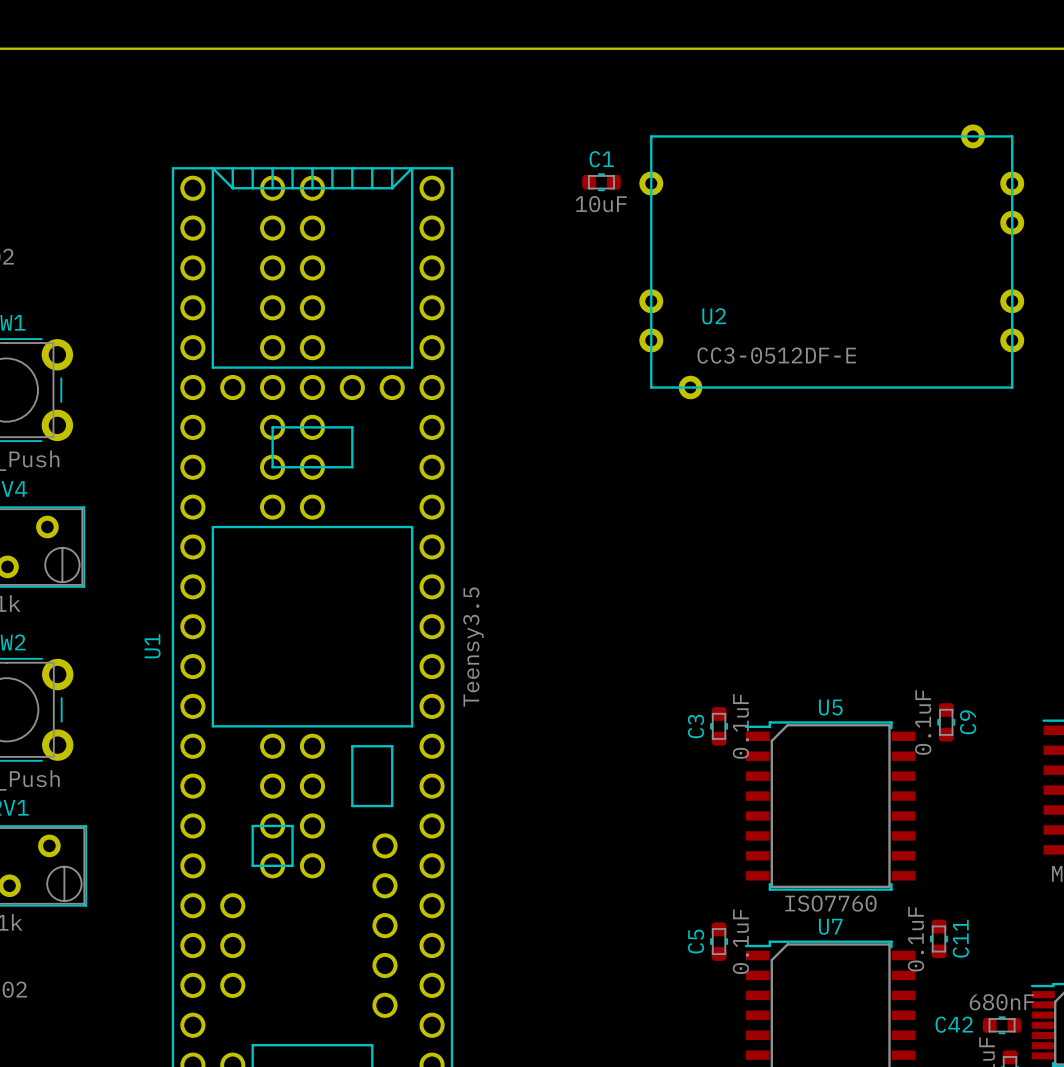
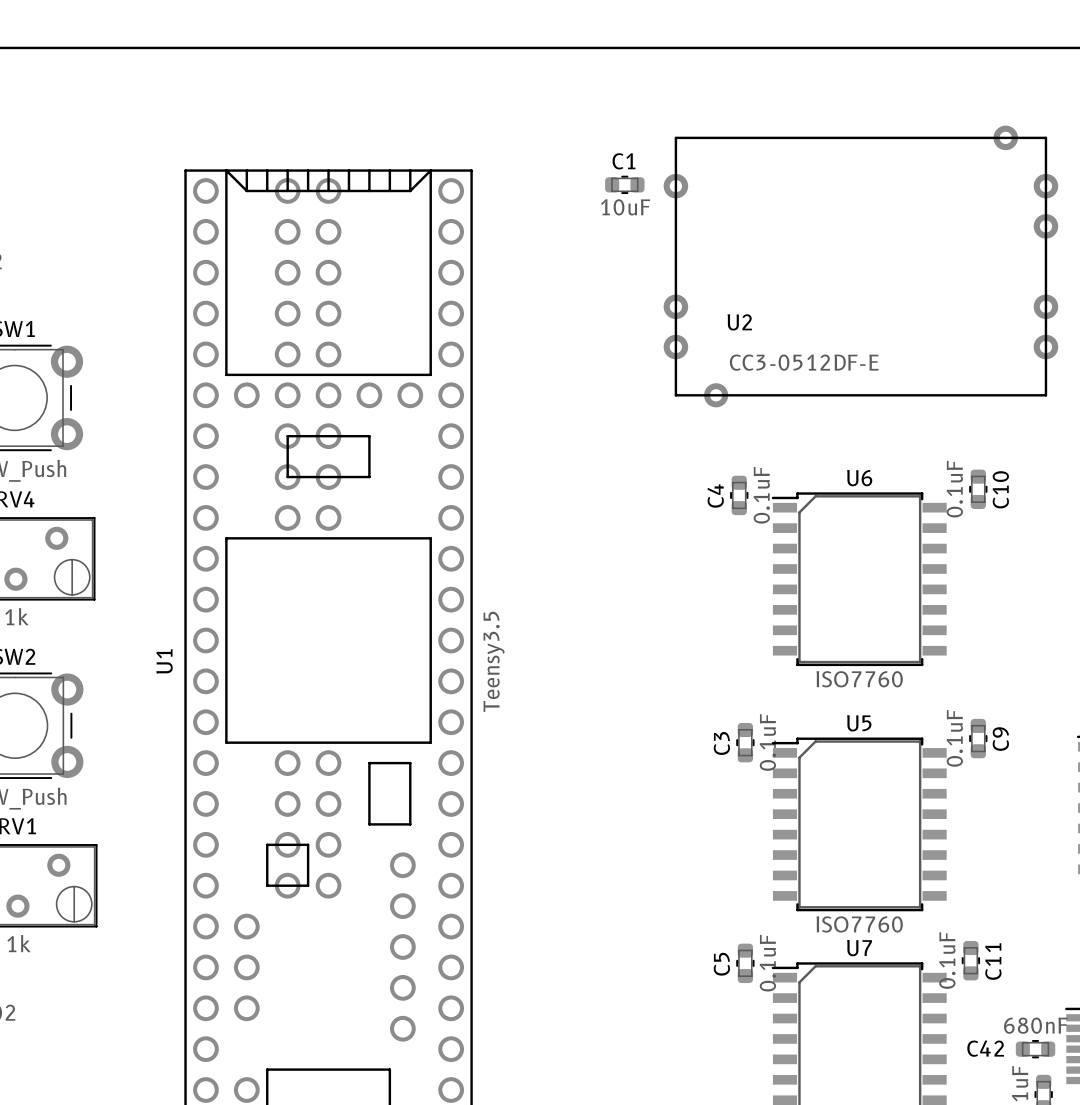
C10: none -> 0.1uF (978, 489)
C4: none -> 0.1uF (739, 495)
U6: none -> ISO7760 (859, 579)

